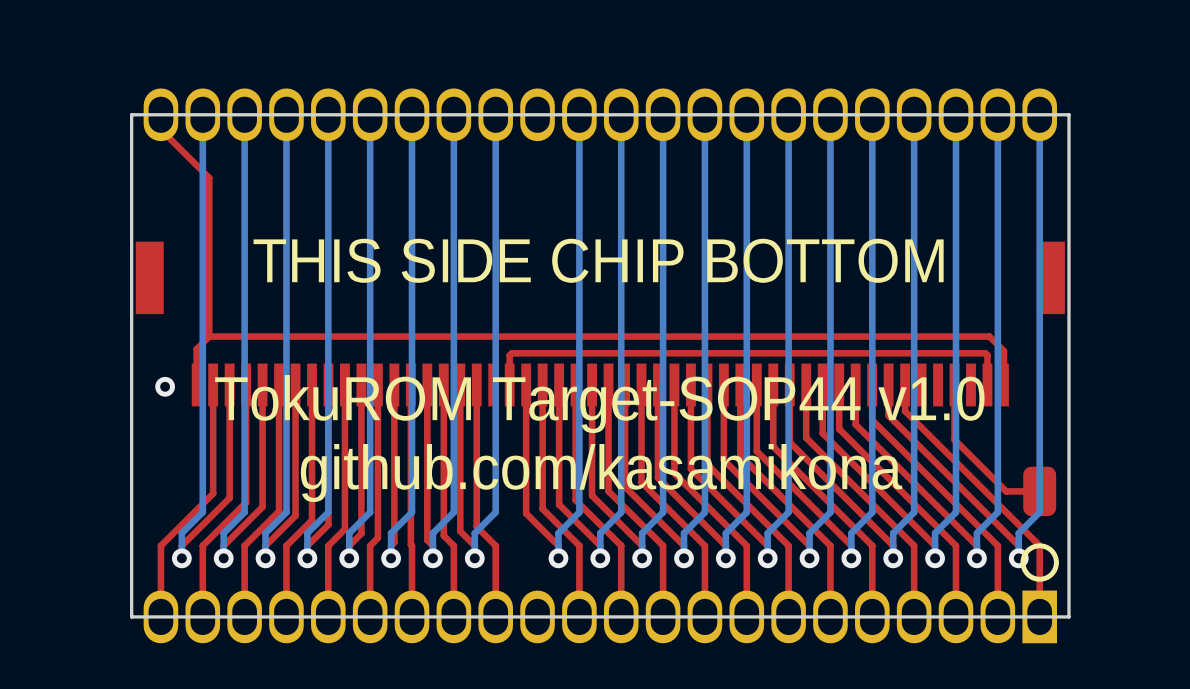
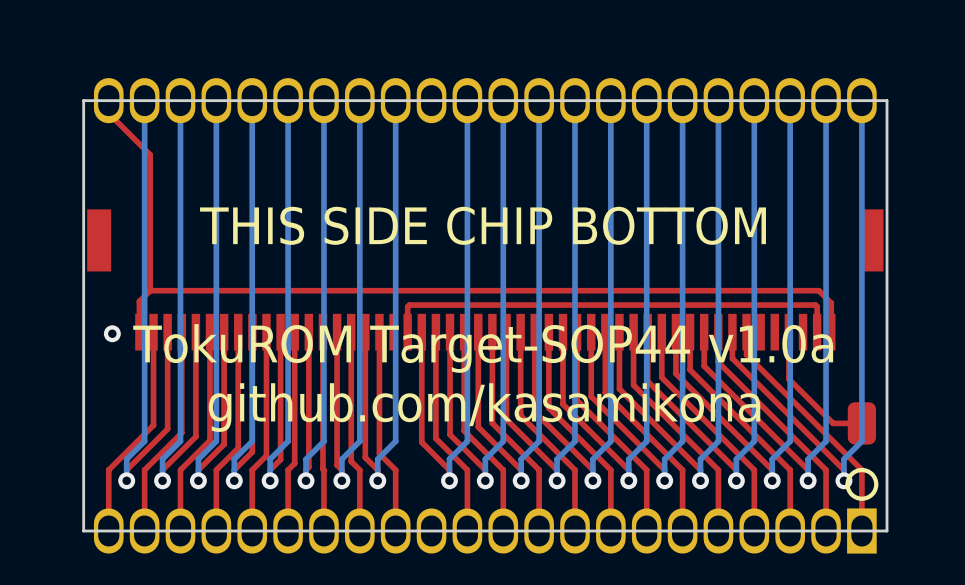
text: TokuROM Target-SOP44 v1.0 (599, 404) -> TokuROM Target-SOP44 v1.0a (483, 348)

